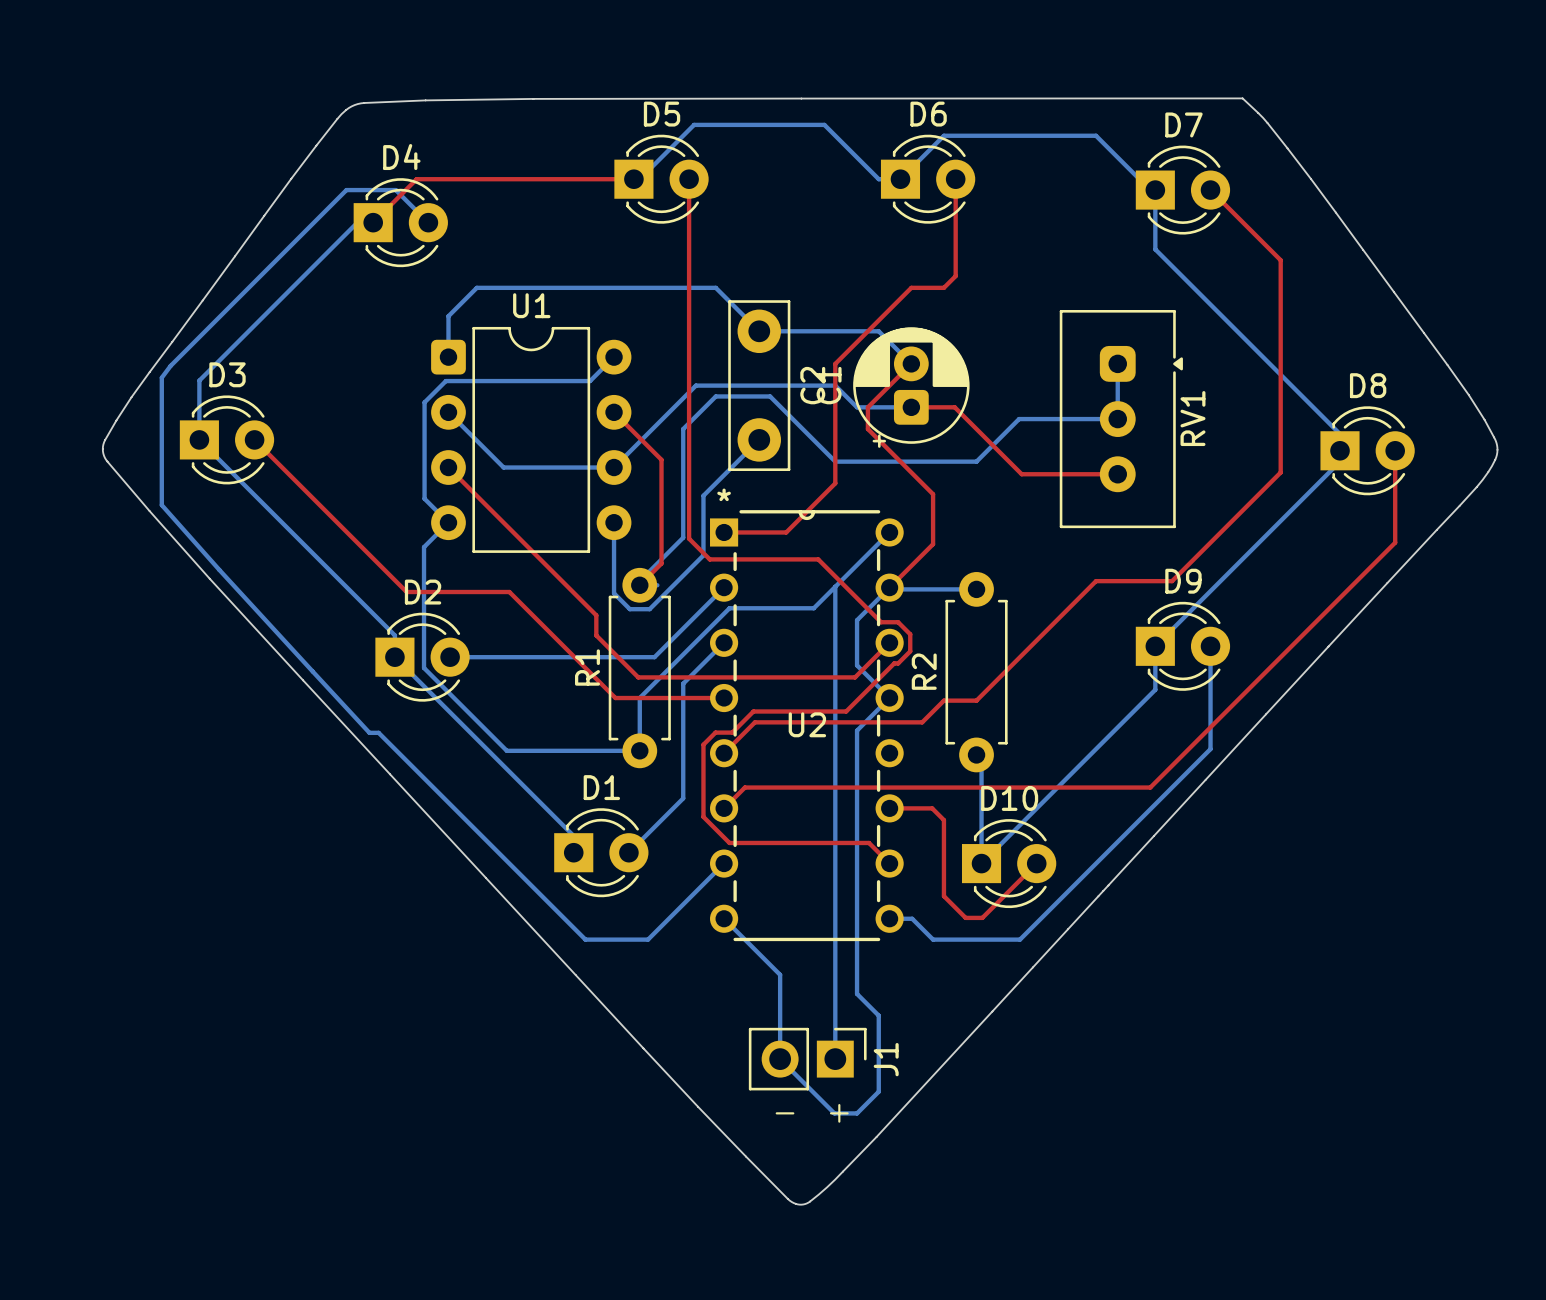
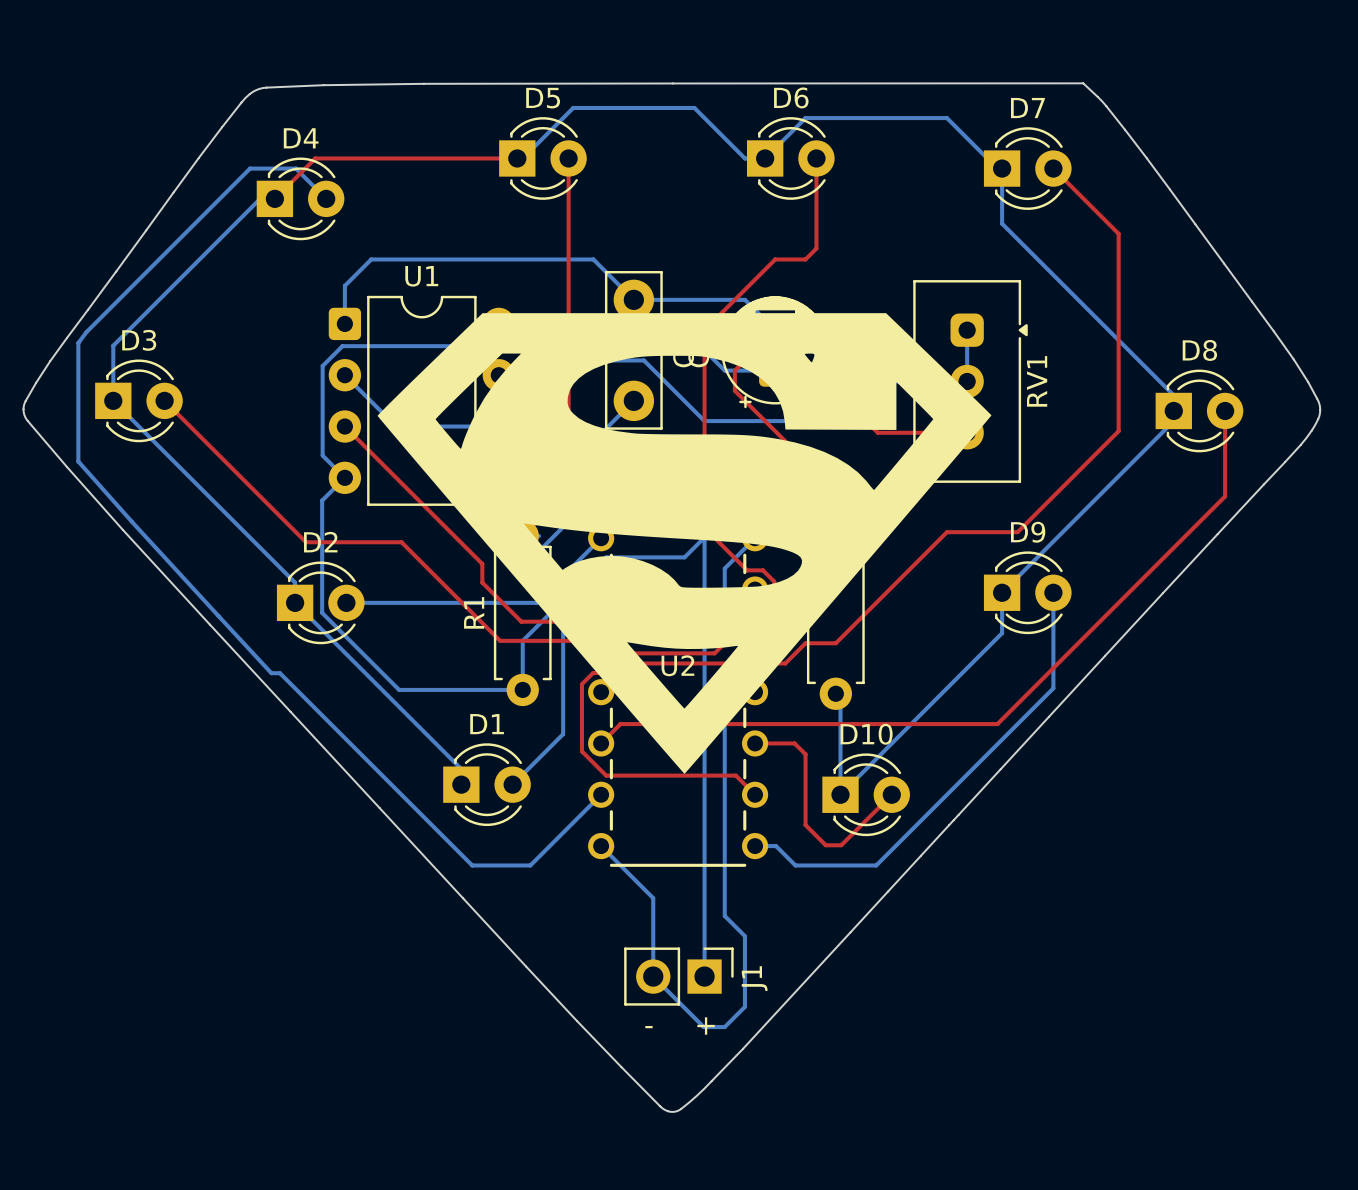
drawing: none -> [377, 313, 992, 774]

